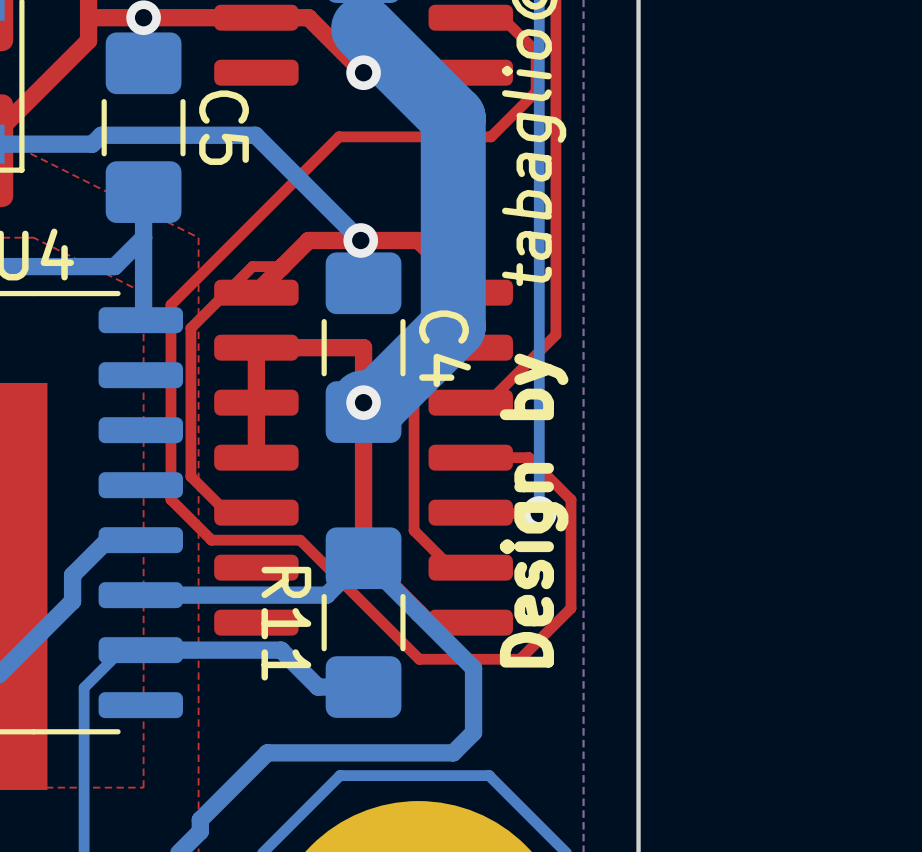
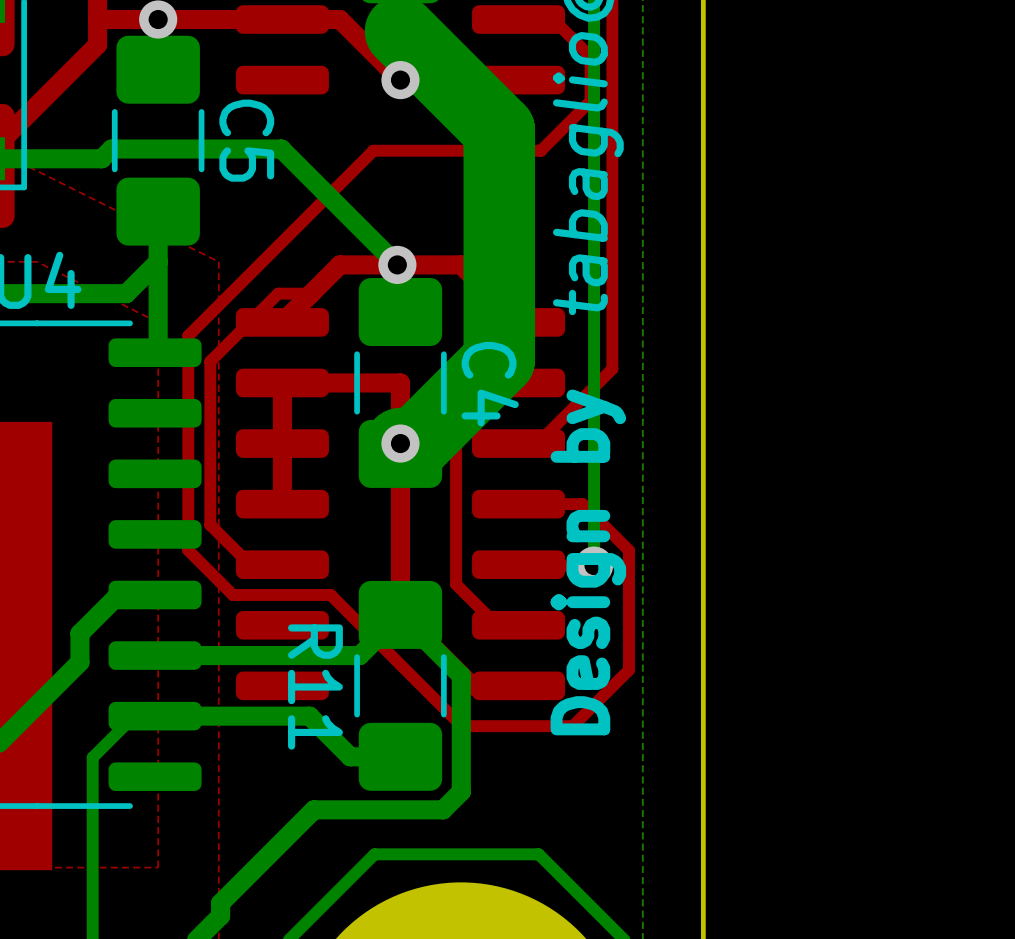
bottom track: (418, 613) (473, 668) (473, 732) (453, 752) (267, 752) -> (461, 675) (461, 791) (443, 809) (313, 809) (294, 829)

